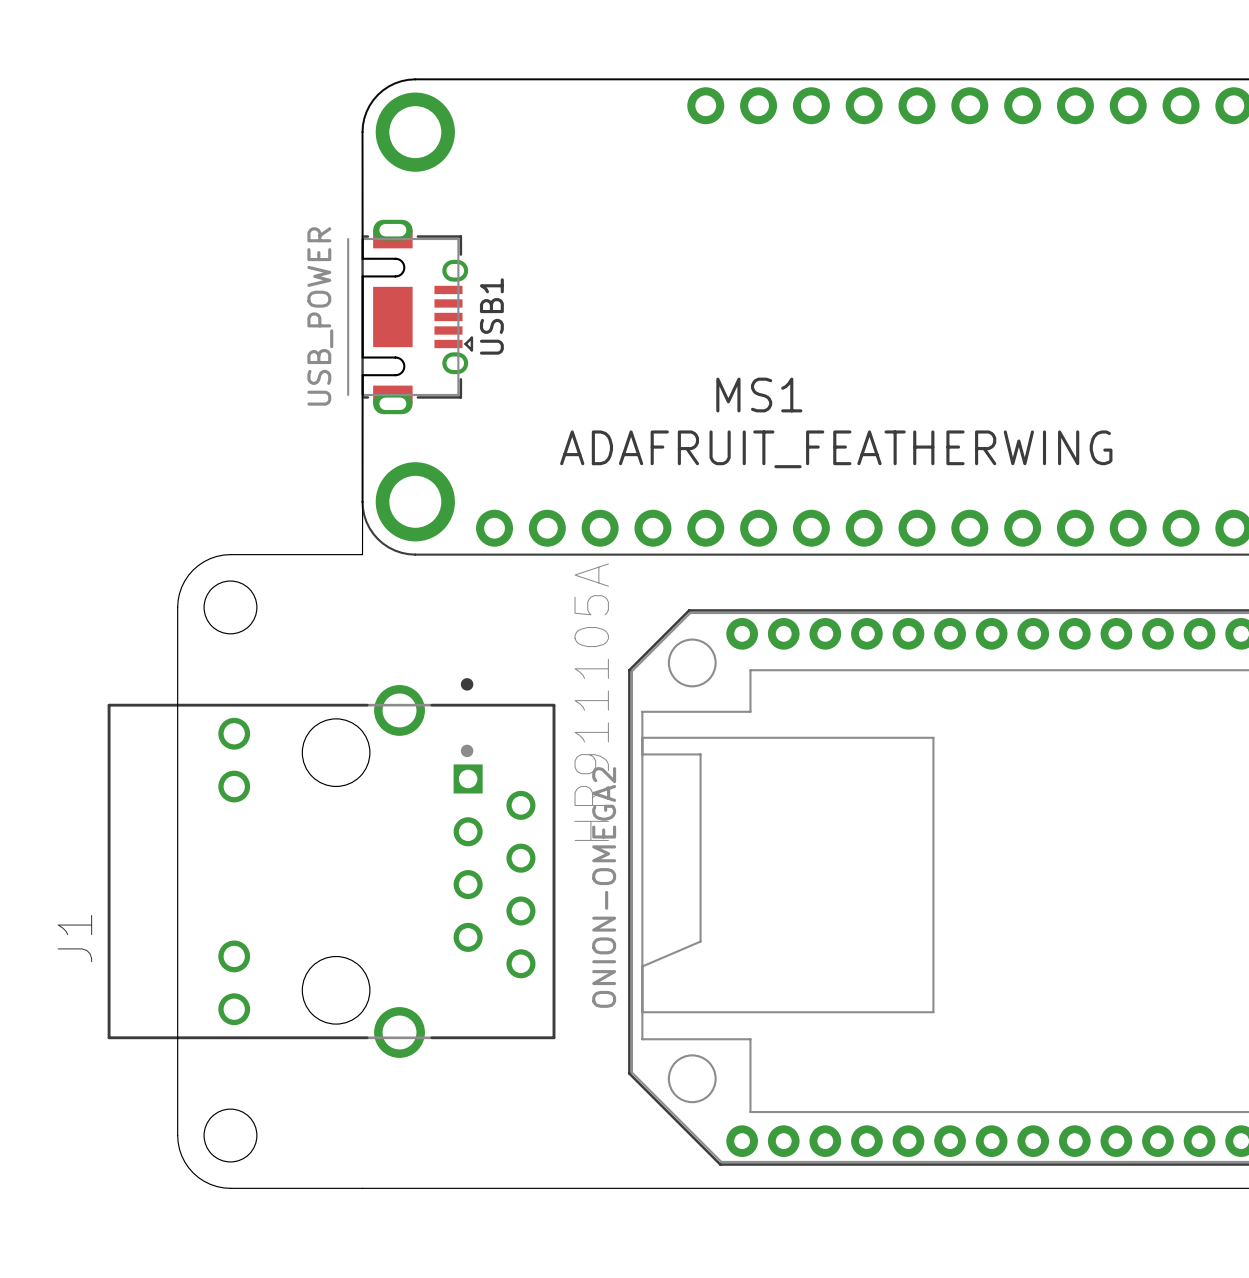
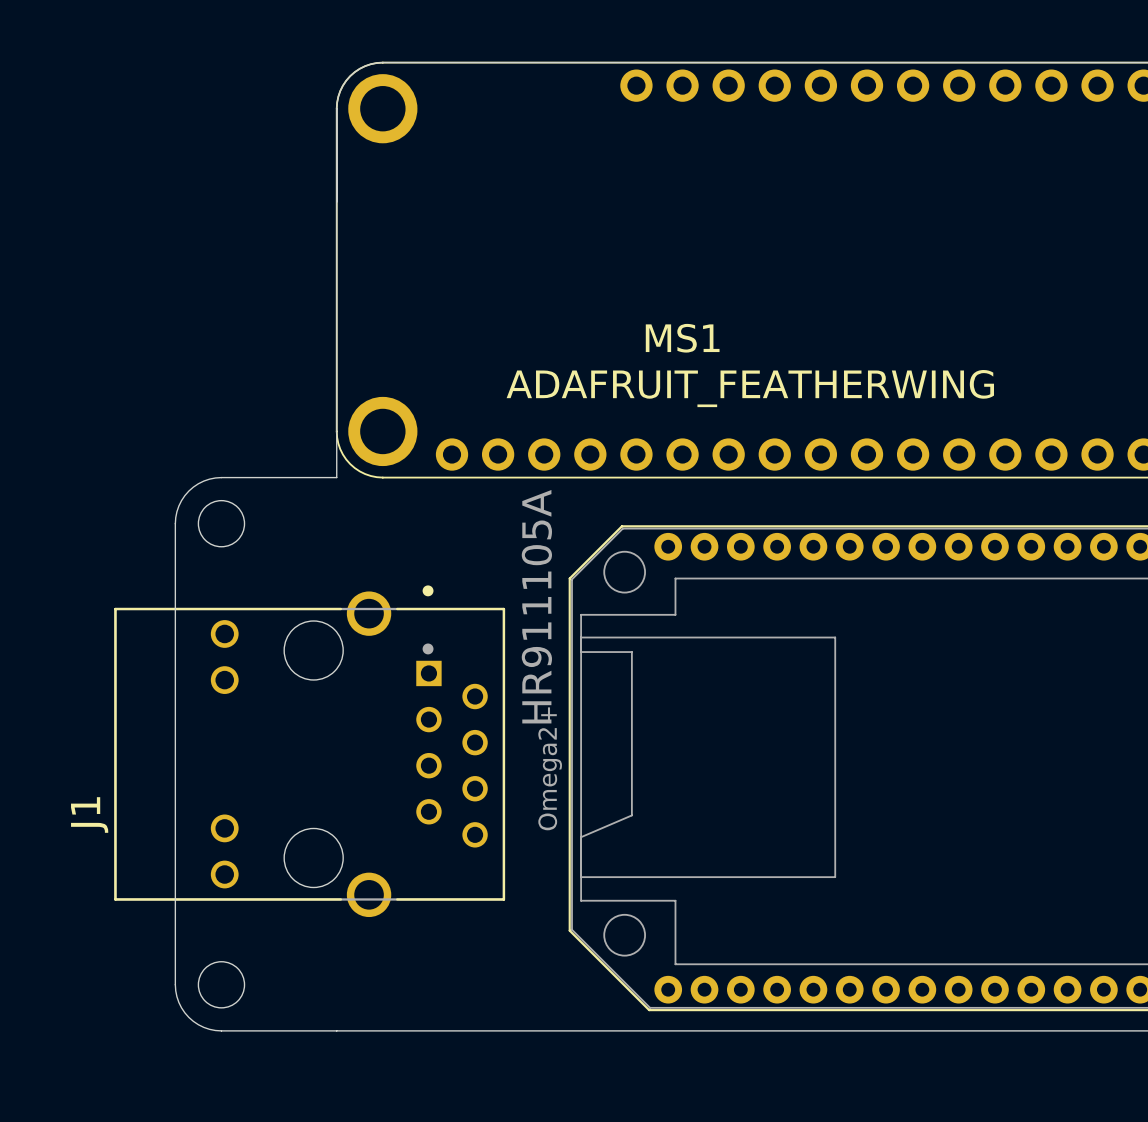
USB1: USB_POWER (410, 316) -> none
board edge: (362, 394) (362, 554) -> (336, 108) (336, 477)
part value: ONION-OMEGA2 (604, 887) -> Omega2+ (550, 768)

